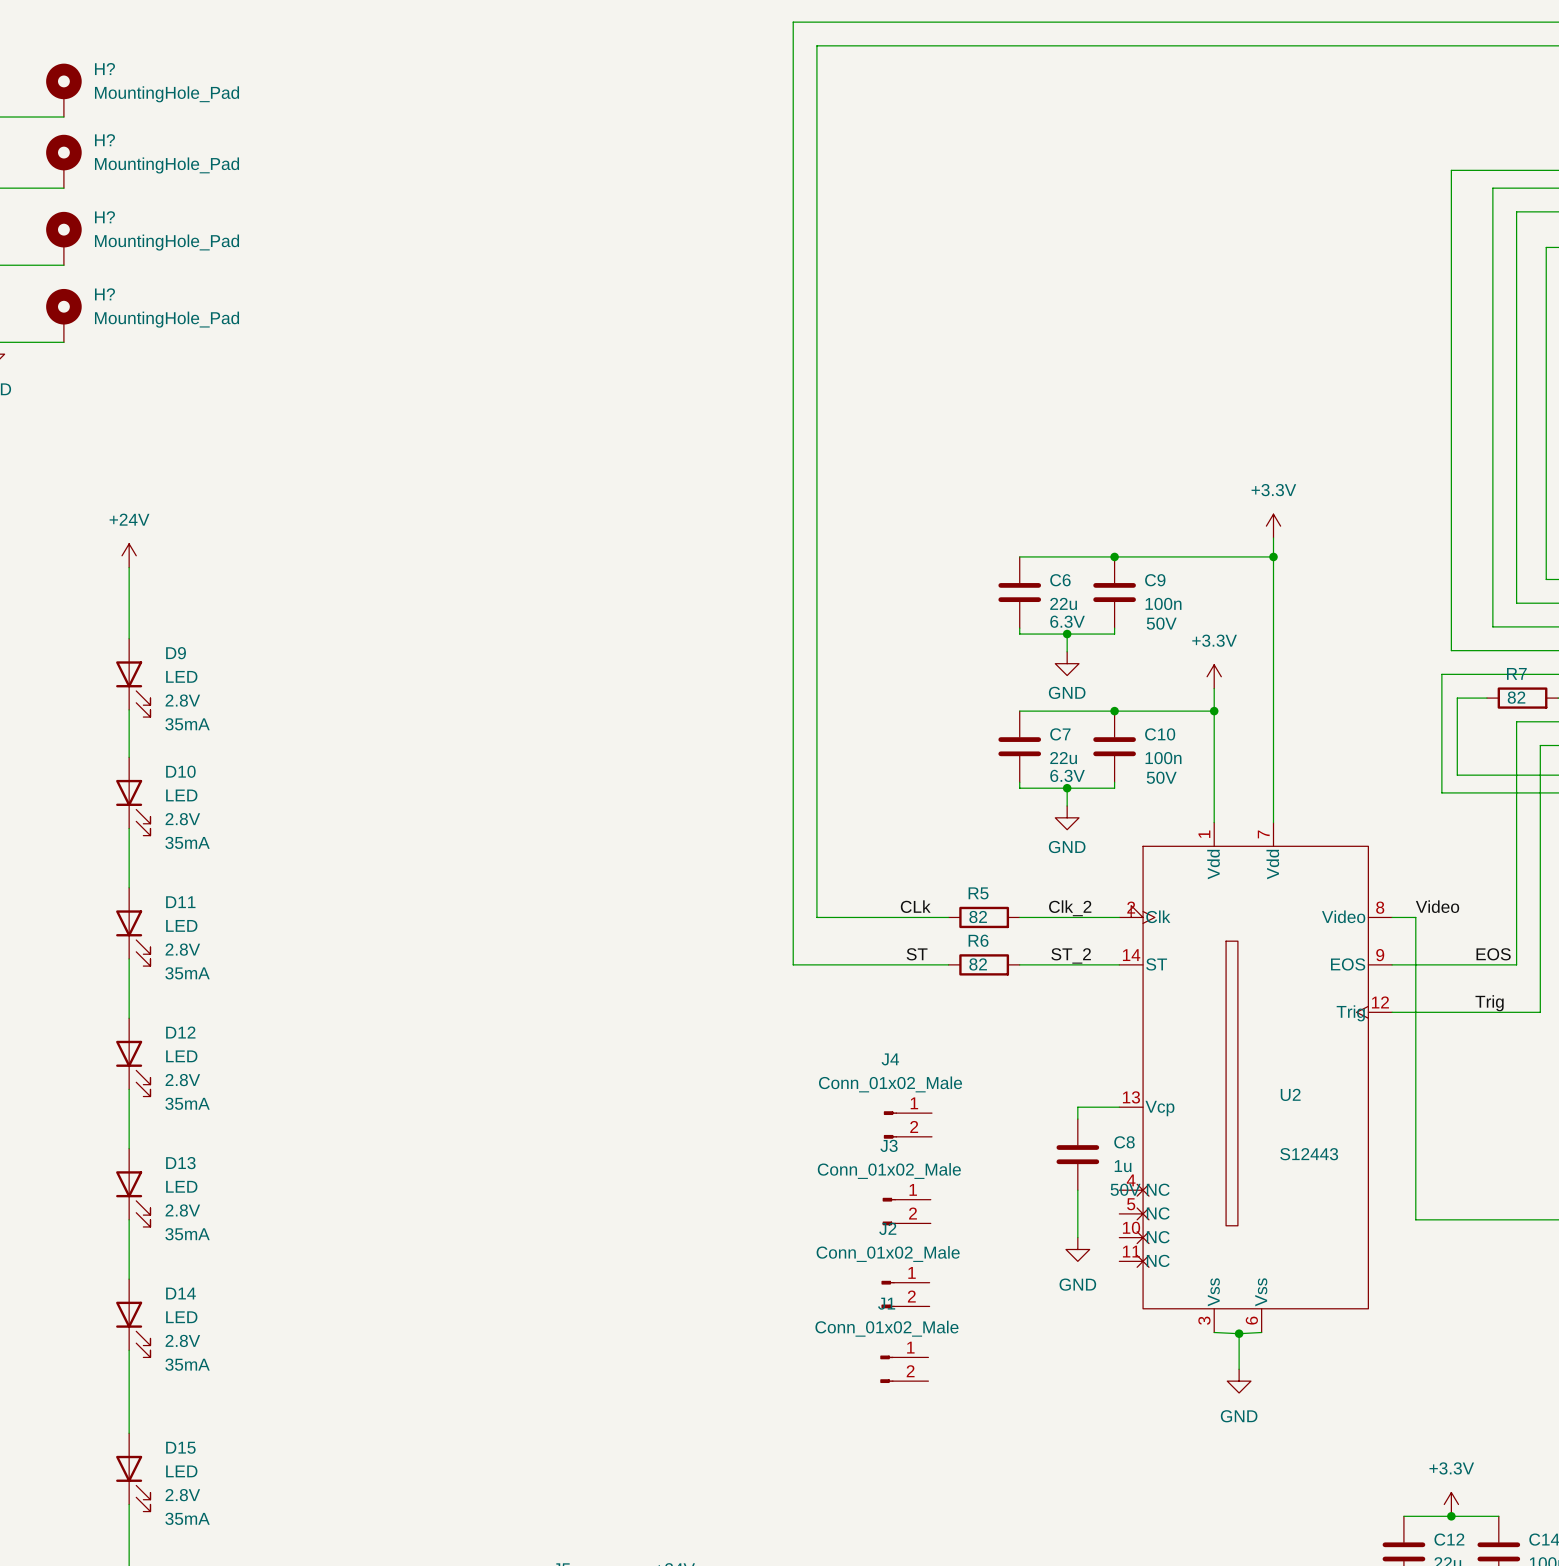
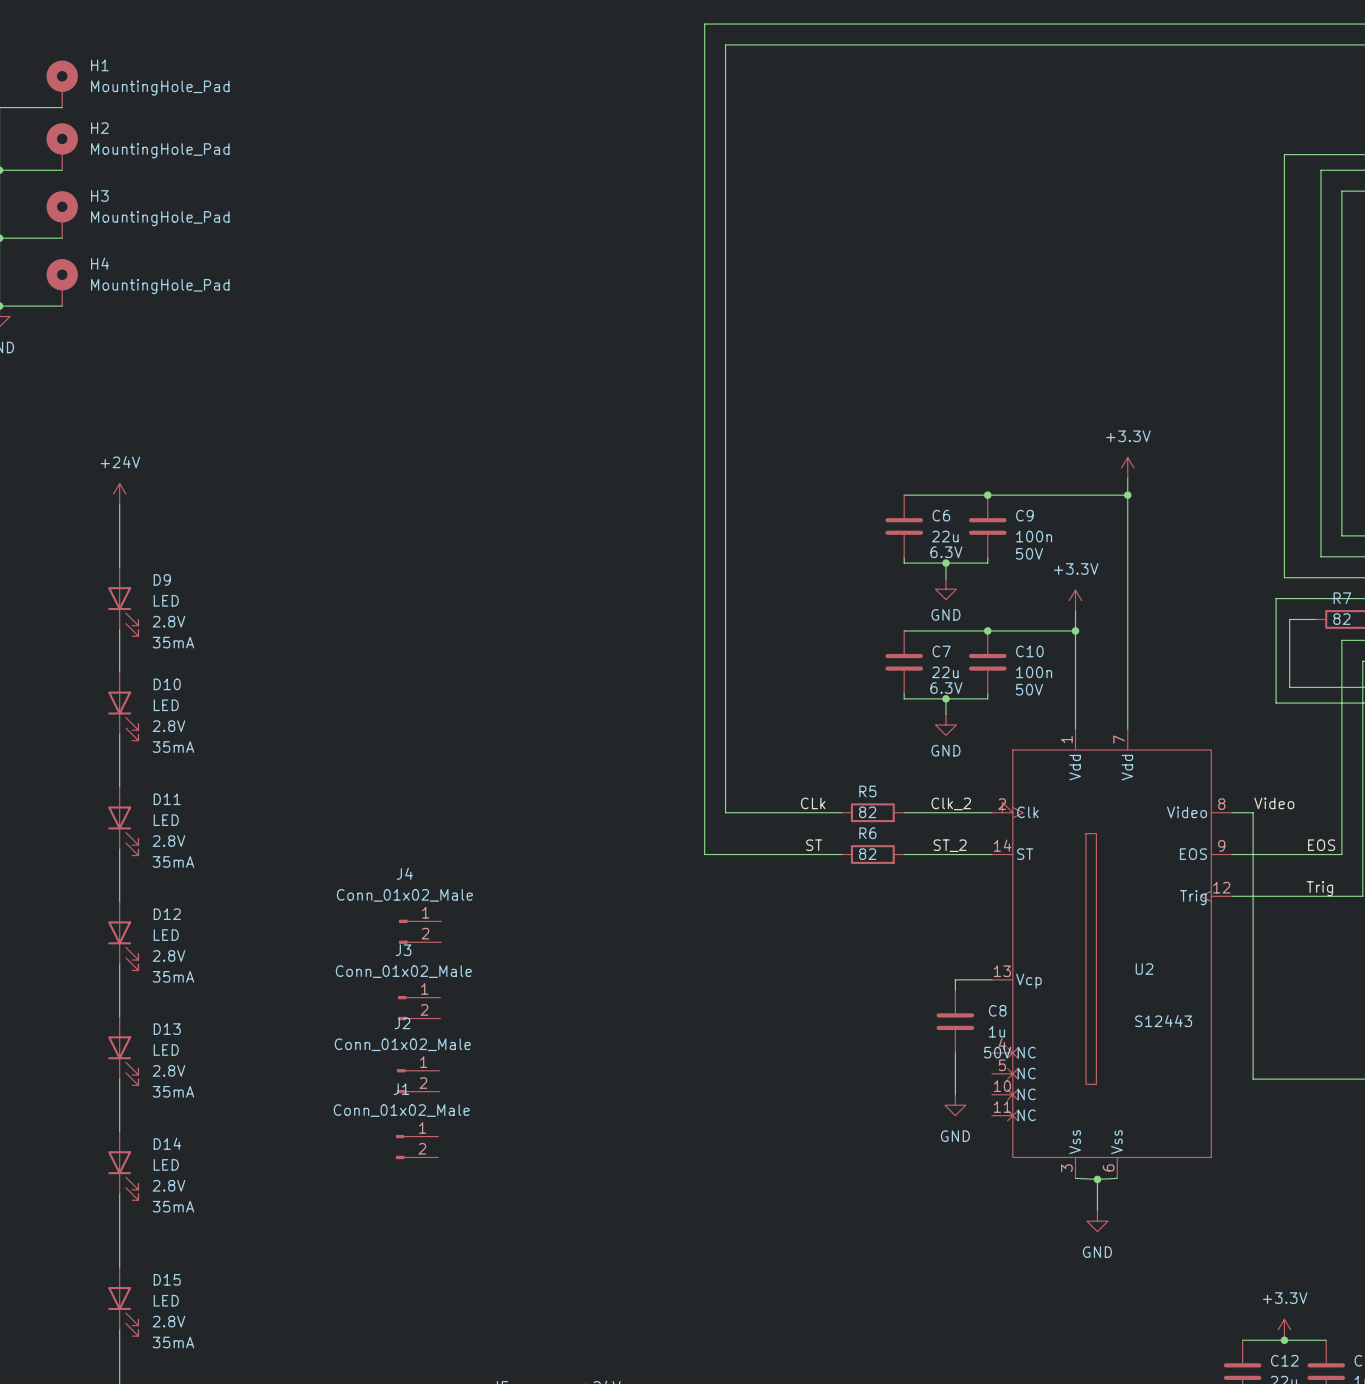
H? name: H? (104, 69) -> H1 (99, 65)
H? name: H? (104, 140) -> H2 (99, 128)
H? name: H? (104, 217) -> H3 (99, 196)
H? name: H? (104, 294) -> H4 (100, 263)
J4 position: (907, 1124) -> (420, 931)
J3 position: (906, 1211) -> (419, 1008)
J2 position: (905, 1294) -> (418, 1081)
J1 position: (904, 1369) -> (417, 1147)

